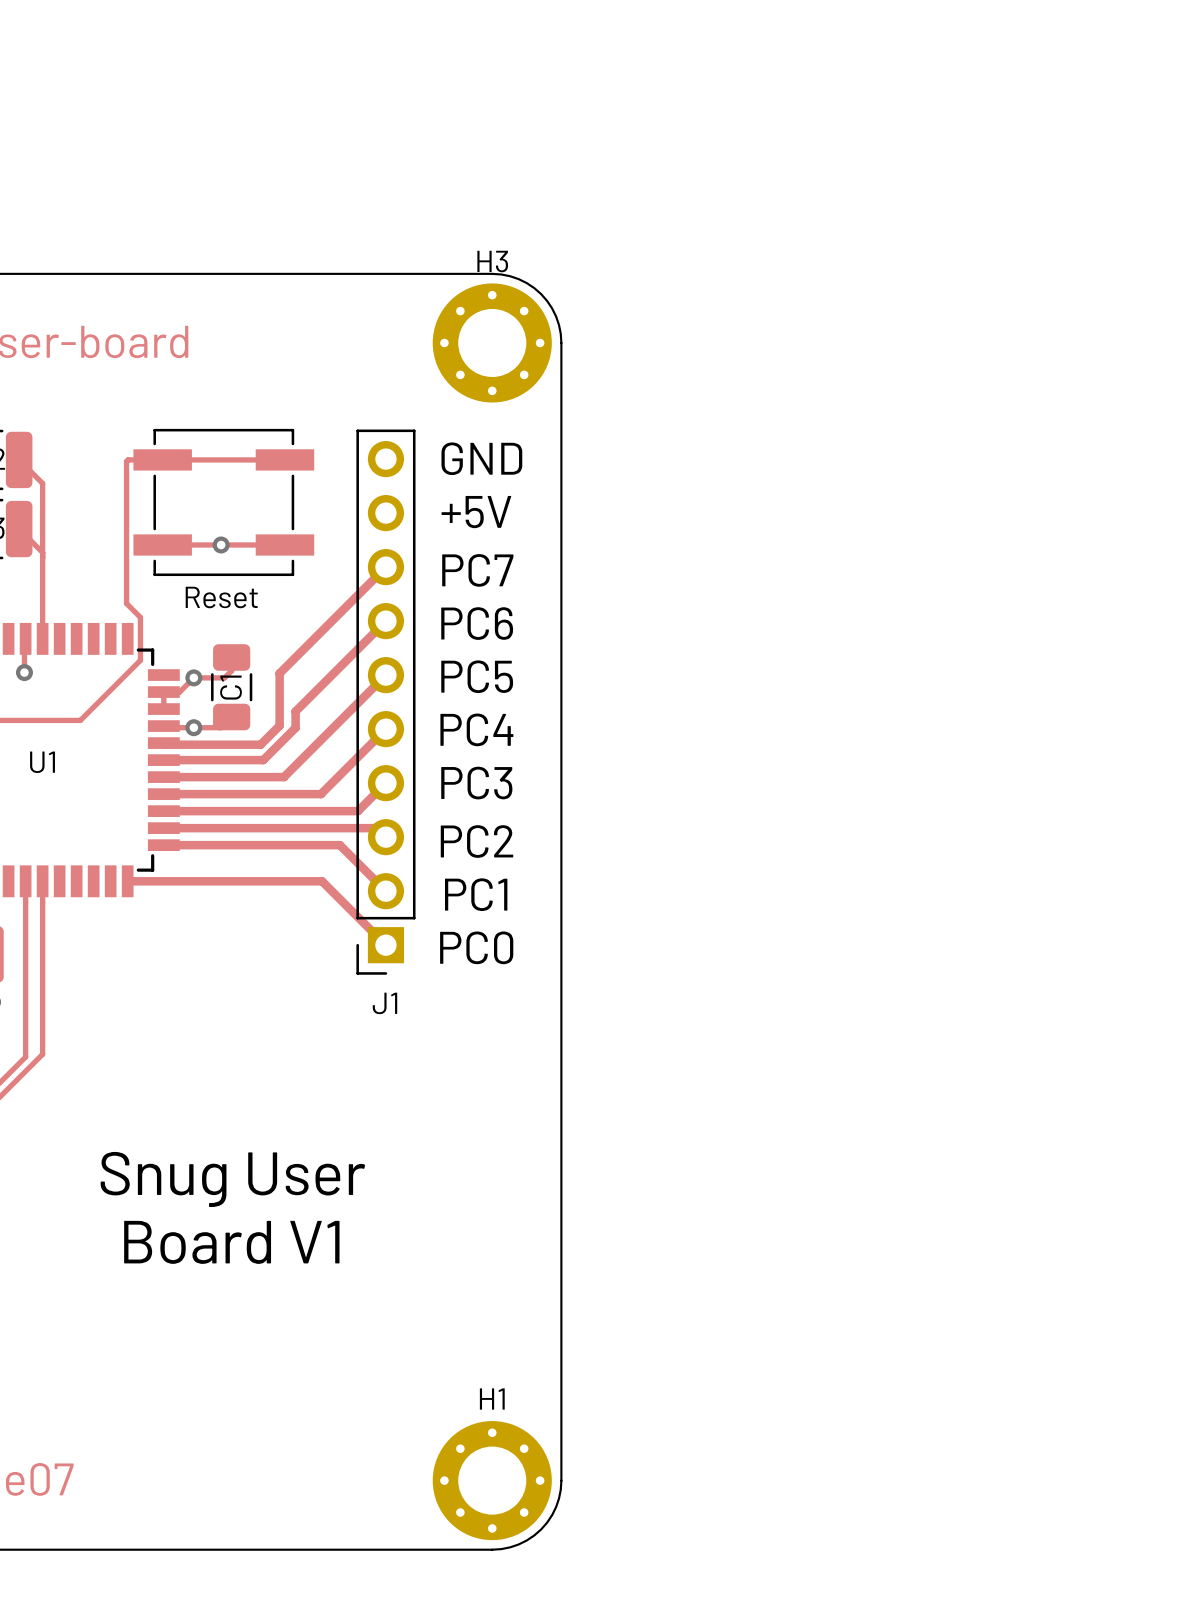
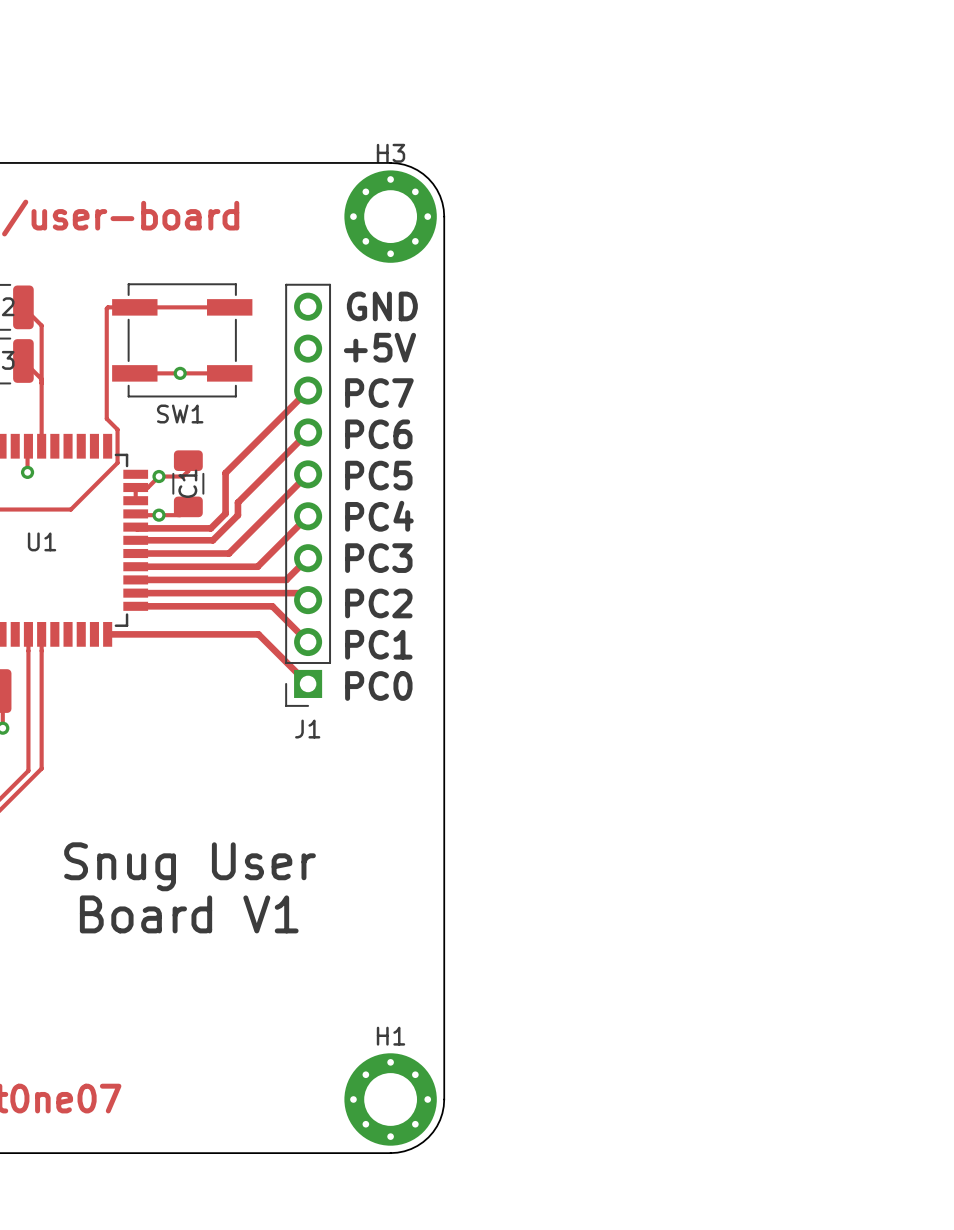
Reset name: Reset (221, 597) -> SW1 (180, 414)

